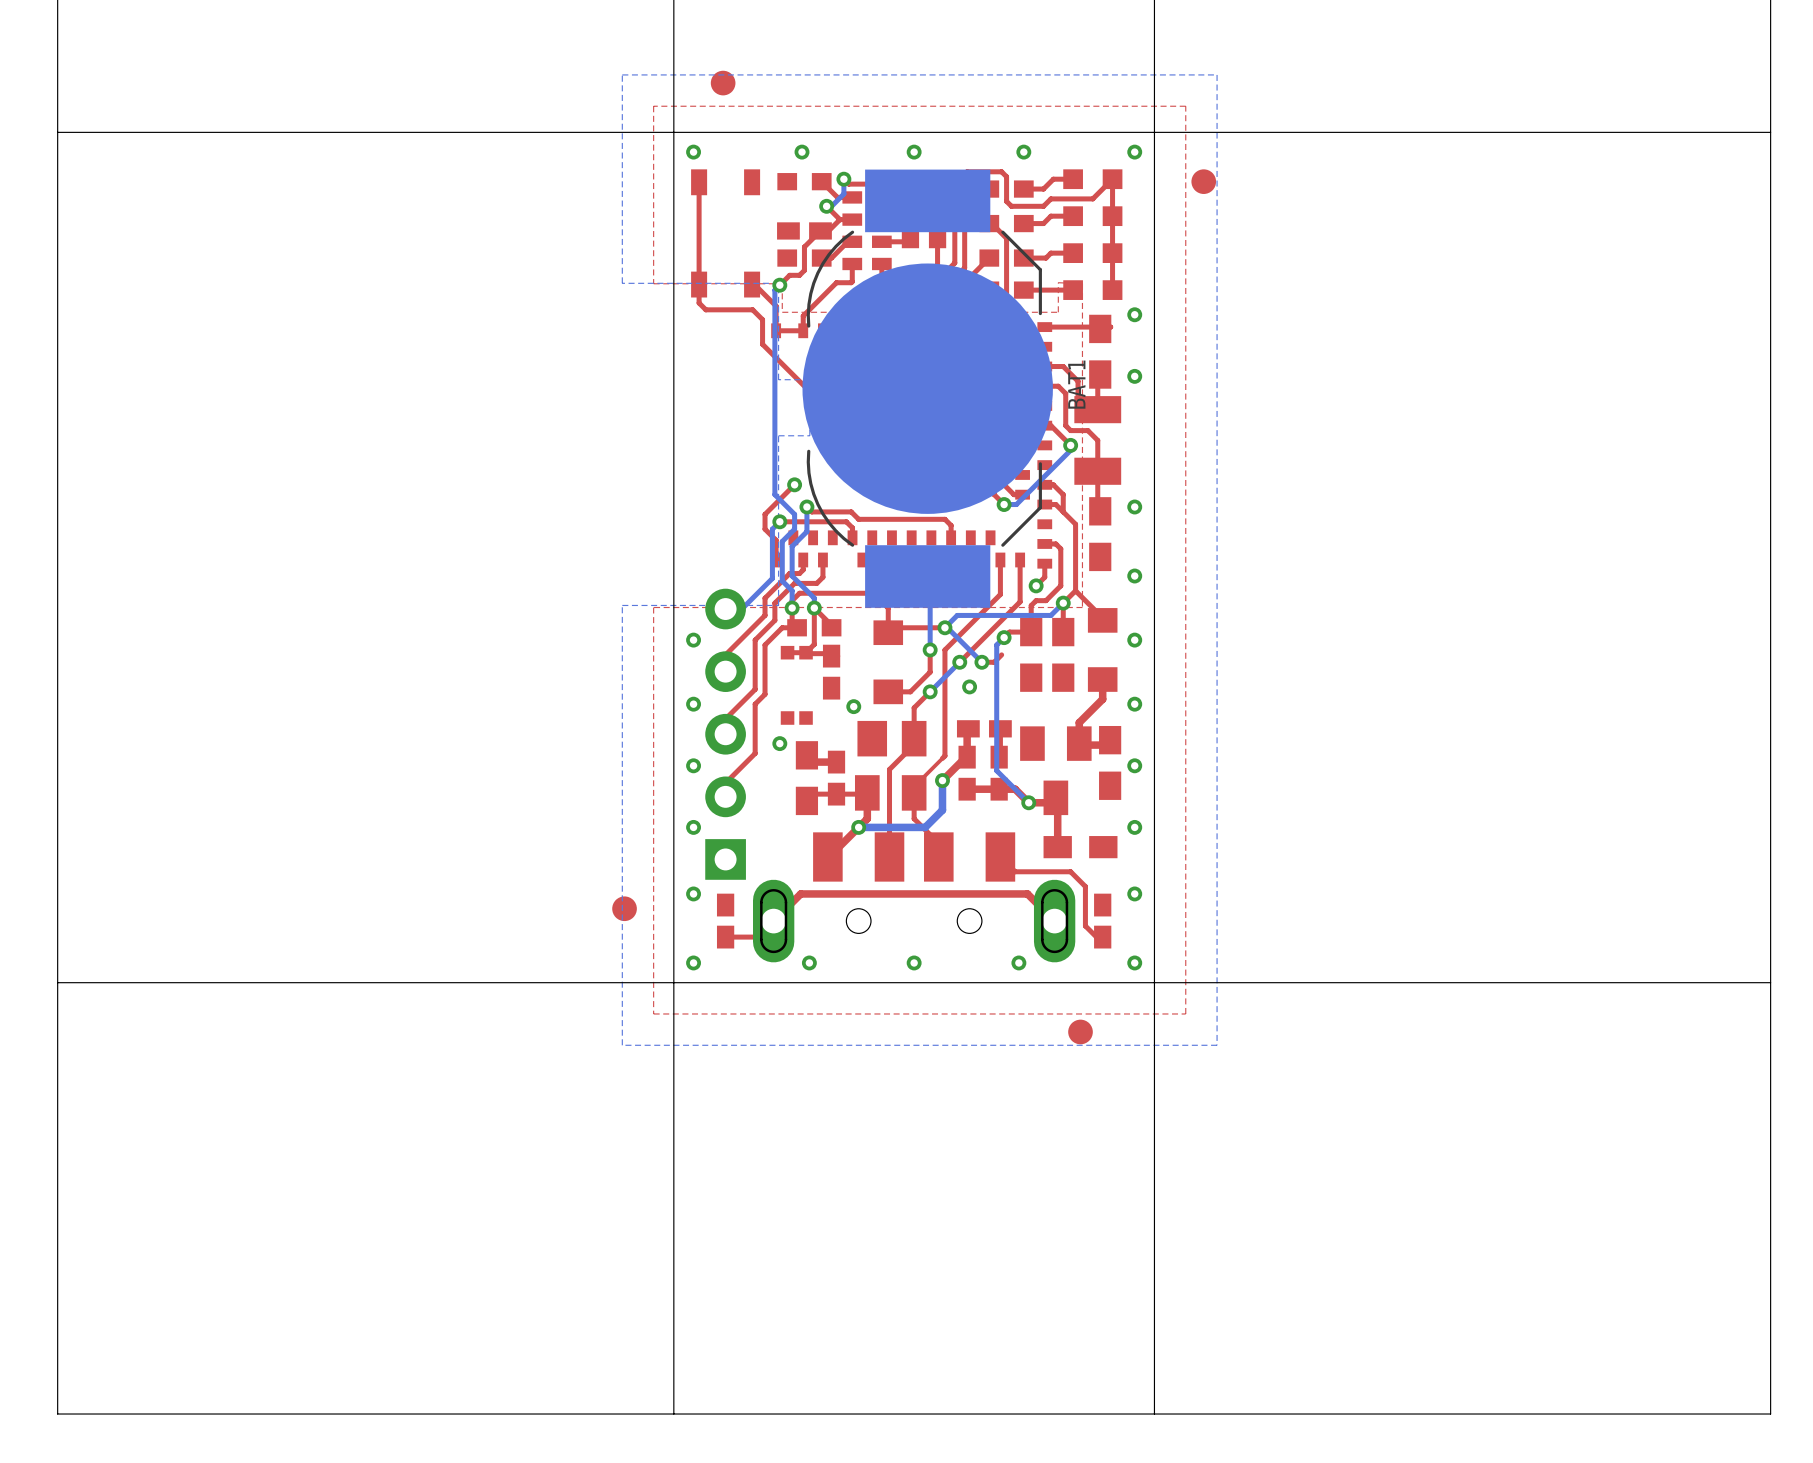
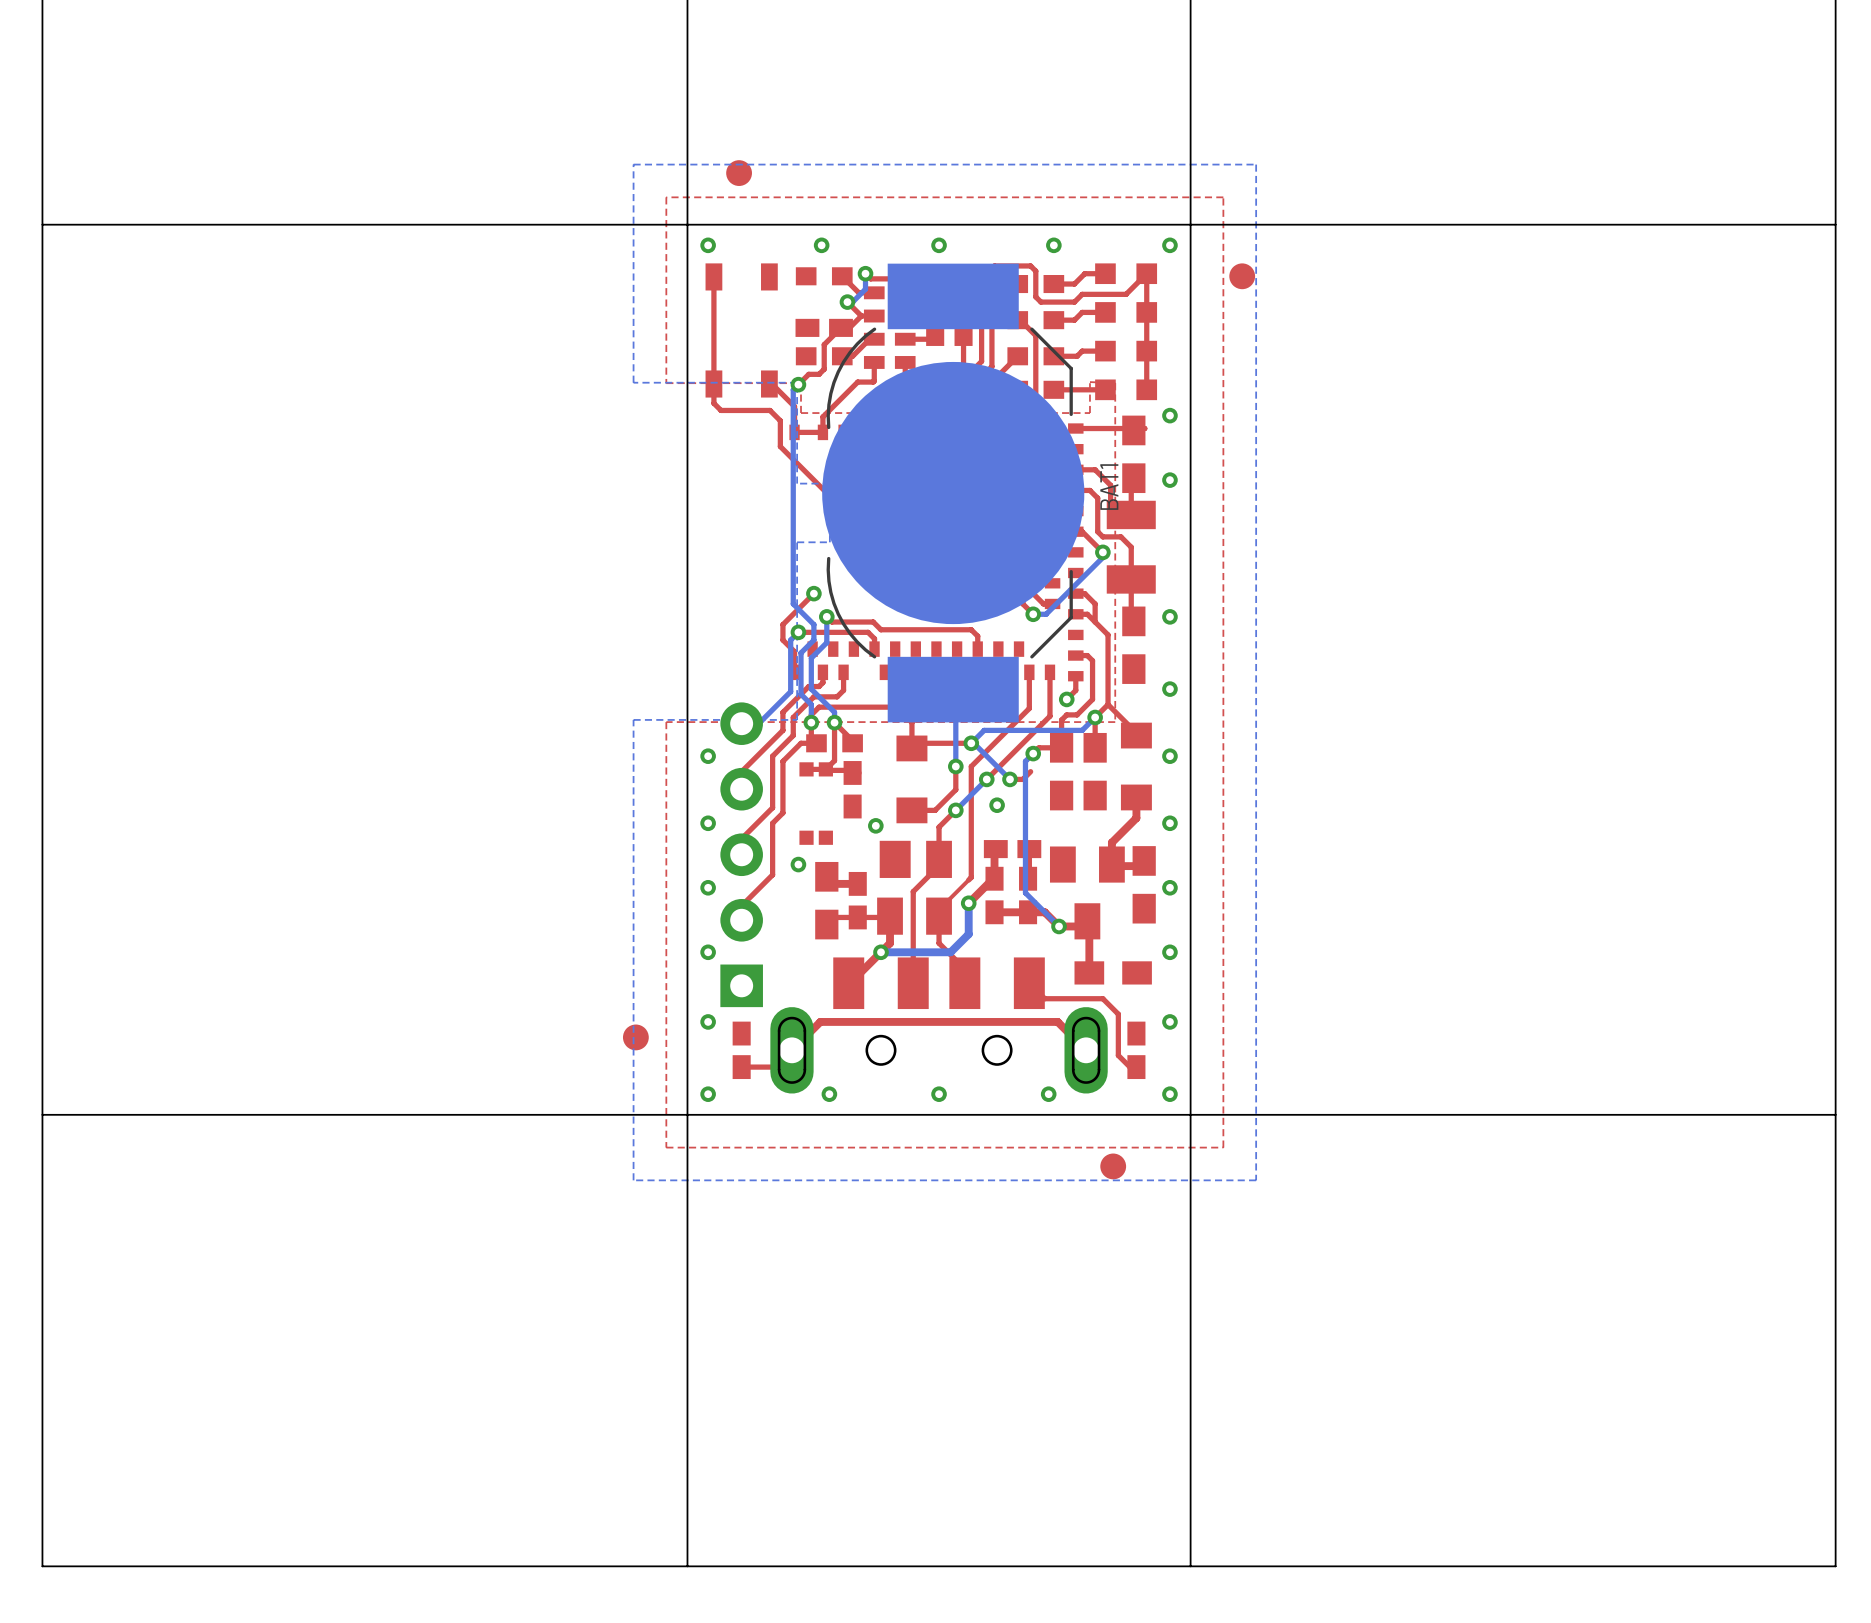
part footprint: [752, 832, 1076, 963] -> [770, 957, 1108, 1094]

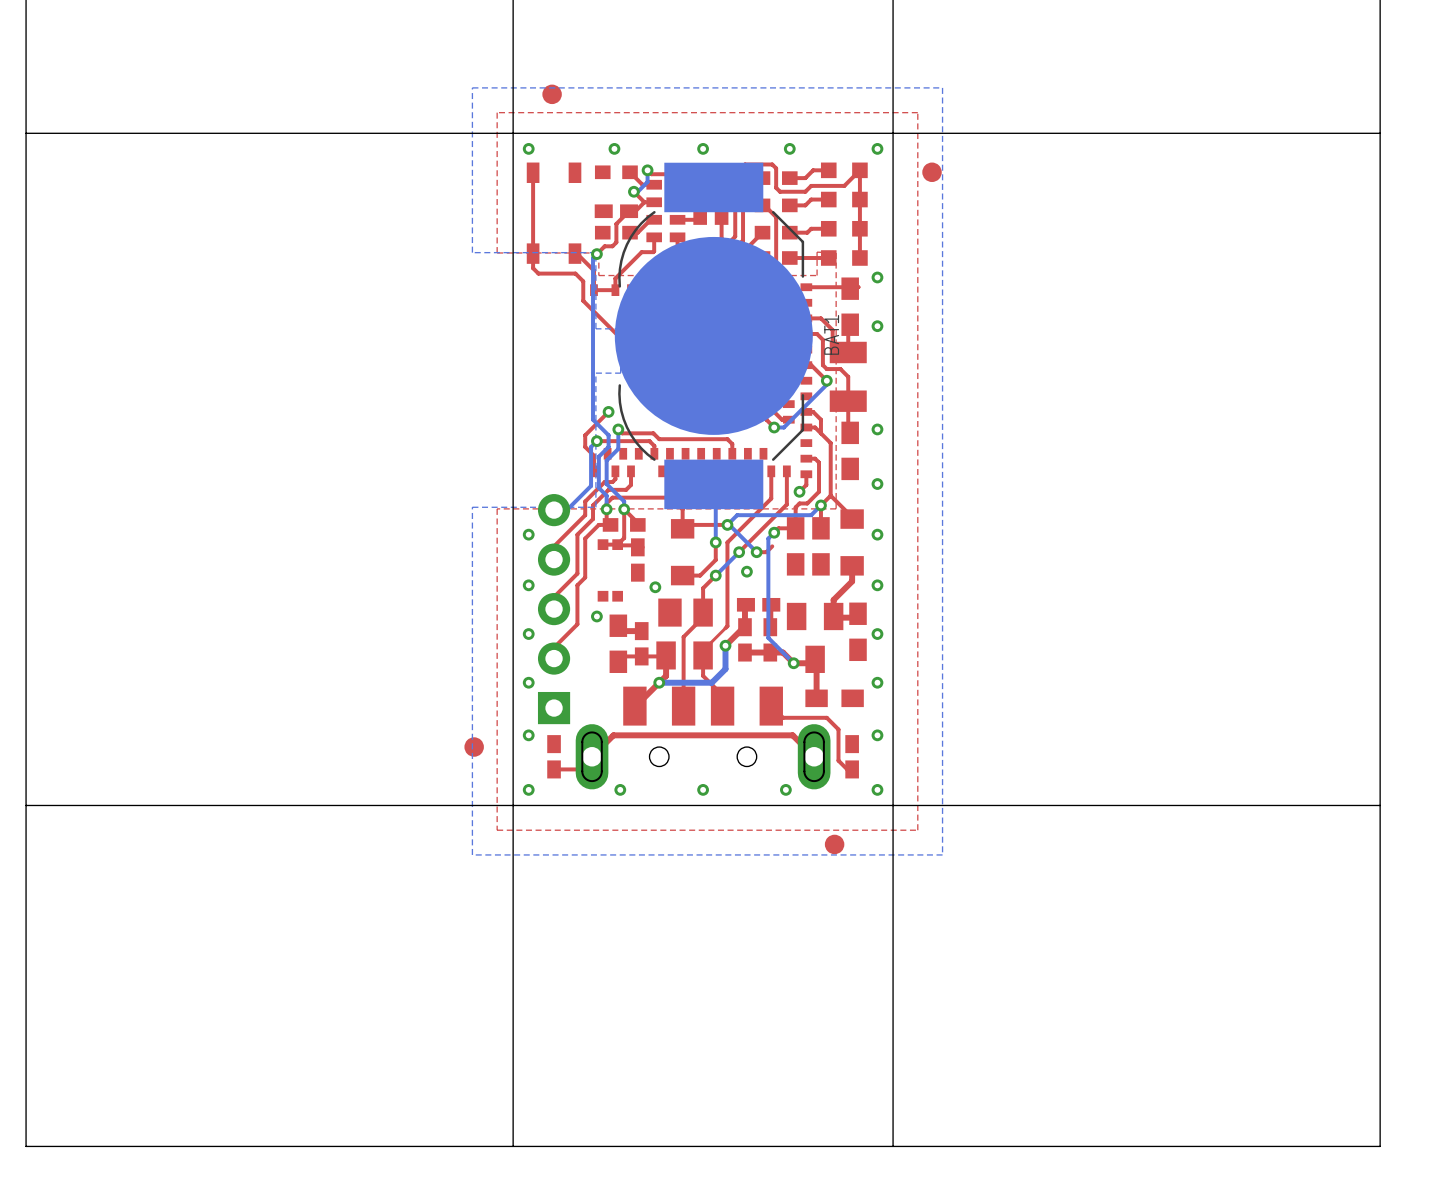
part footprint: [770, 957, 1108, 1094] -> [575, 686, 831, 790]

